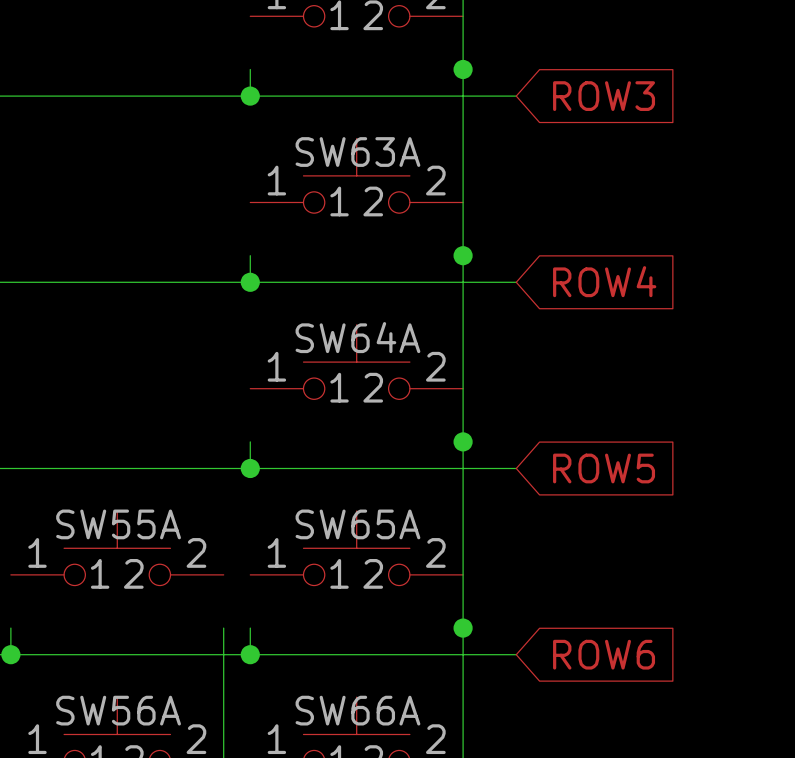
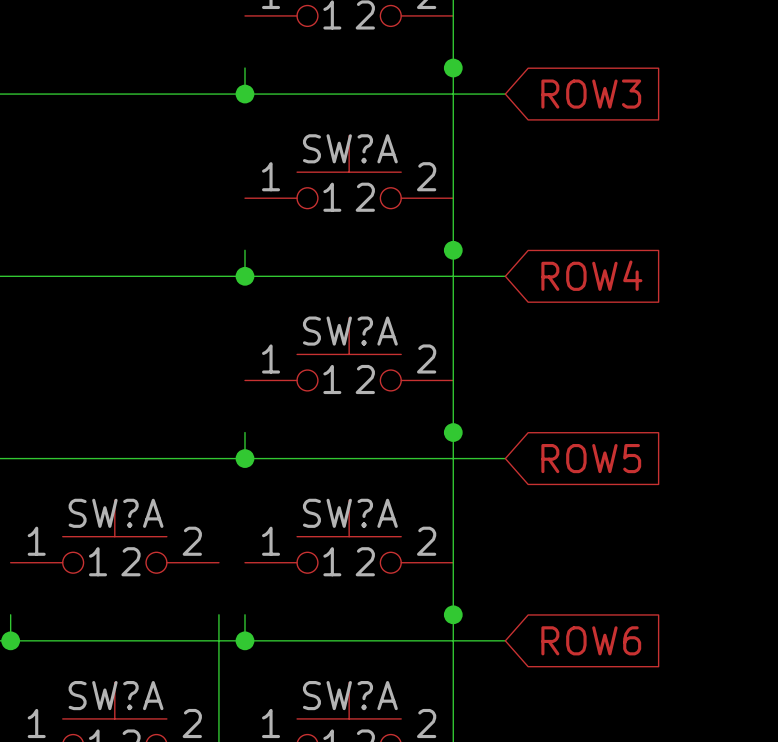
SW63A name: SW63A (357, 152) -> SW?A (350, 148)
SW64A name: SW64A (357, 337) -> SW?A (350, 331)
SW55A name: SW55A (118, 524) -> SW?A (116, 513)
SW65A name: SW65A (357, 524) -> SW?A (350, 513)
SW56A name: SW56A (118, 710) -> SW?A (116, 695)
SW66A name: SW66A (357, 710) -> SW?A (350, 695)

